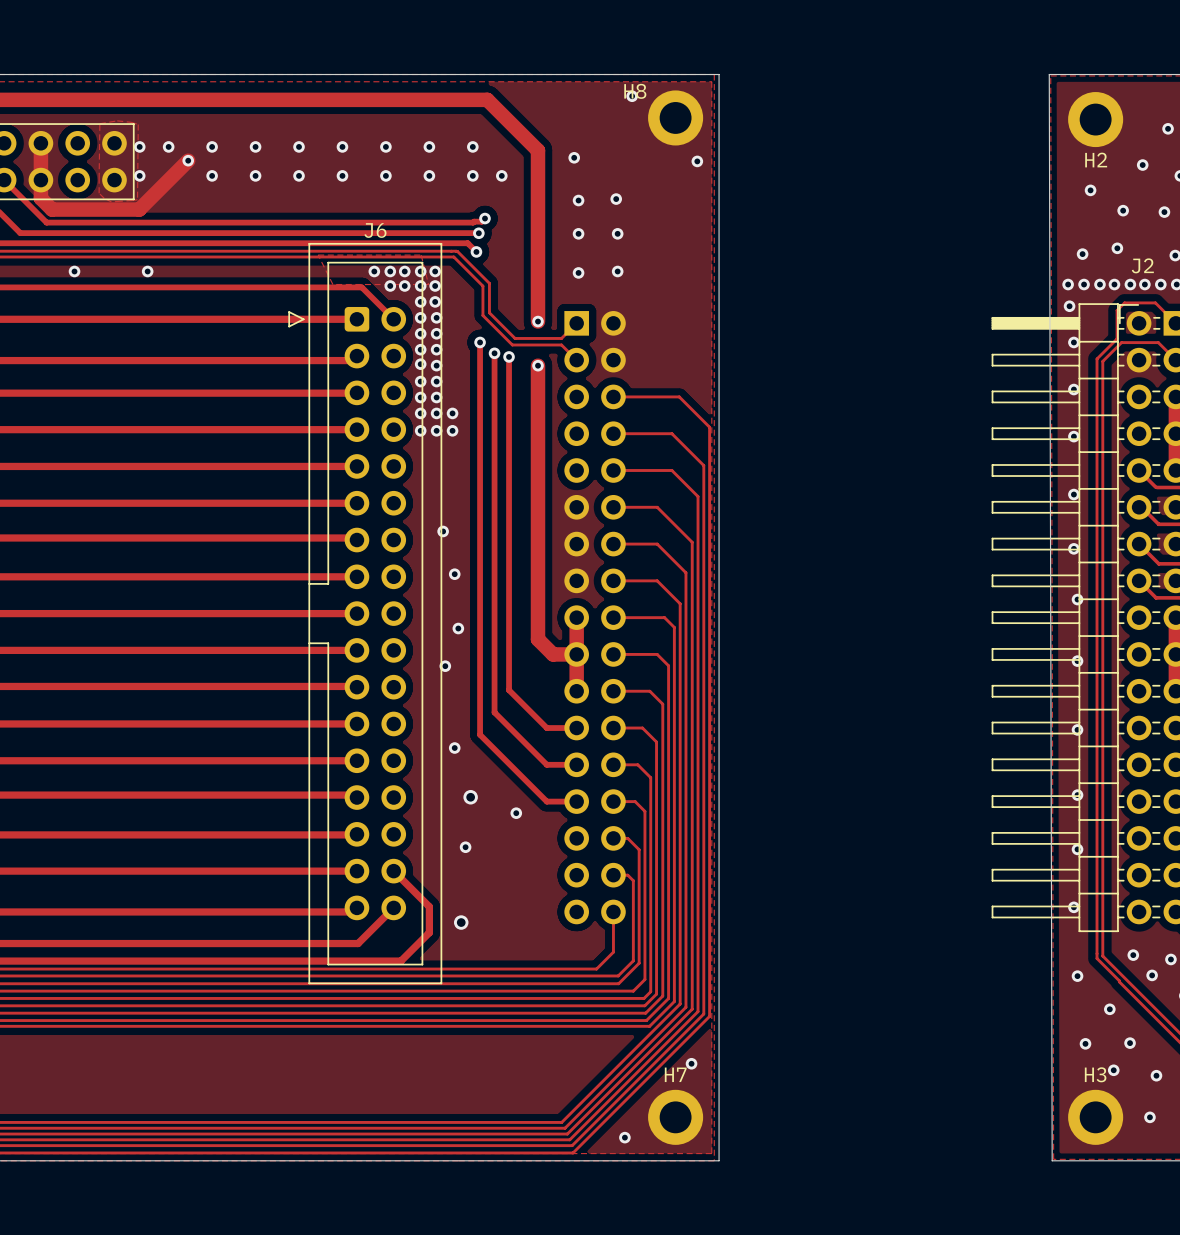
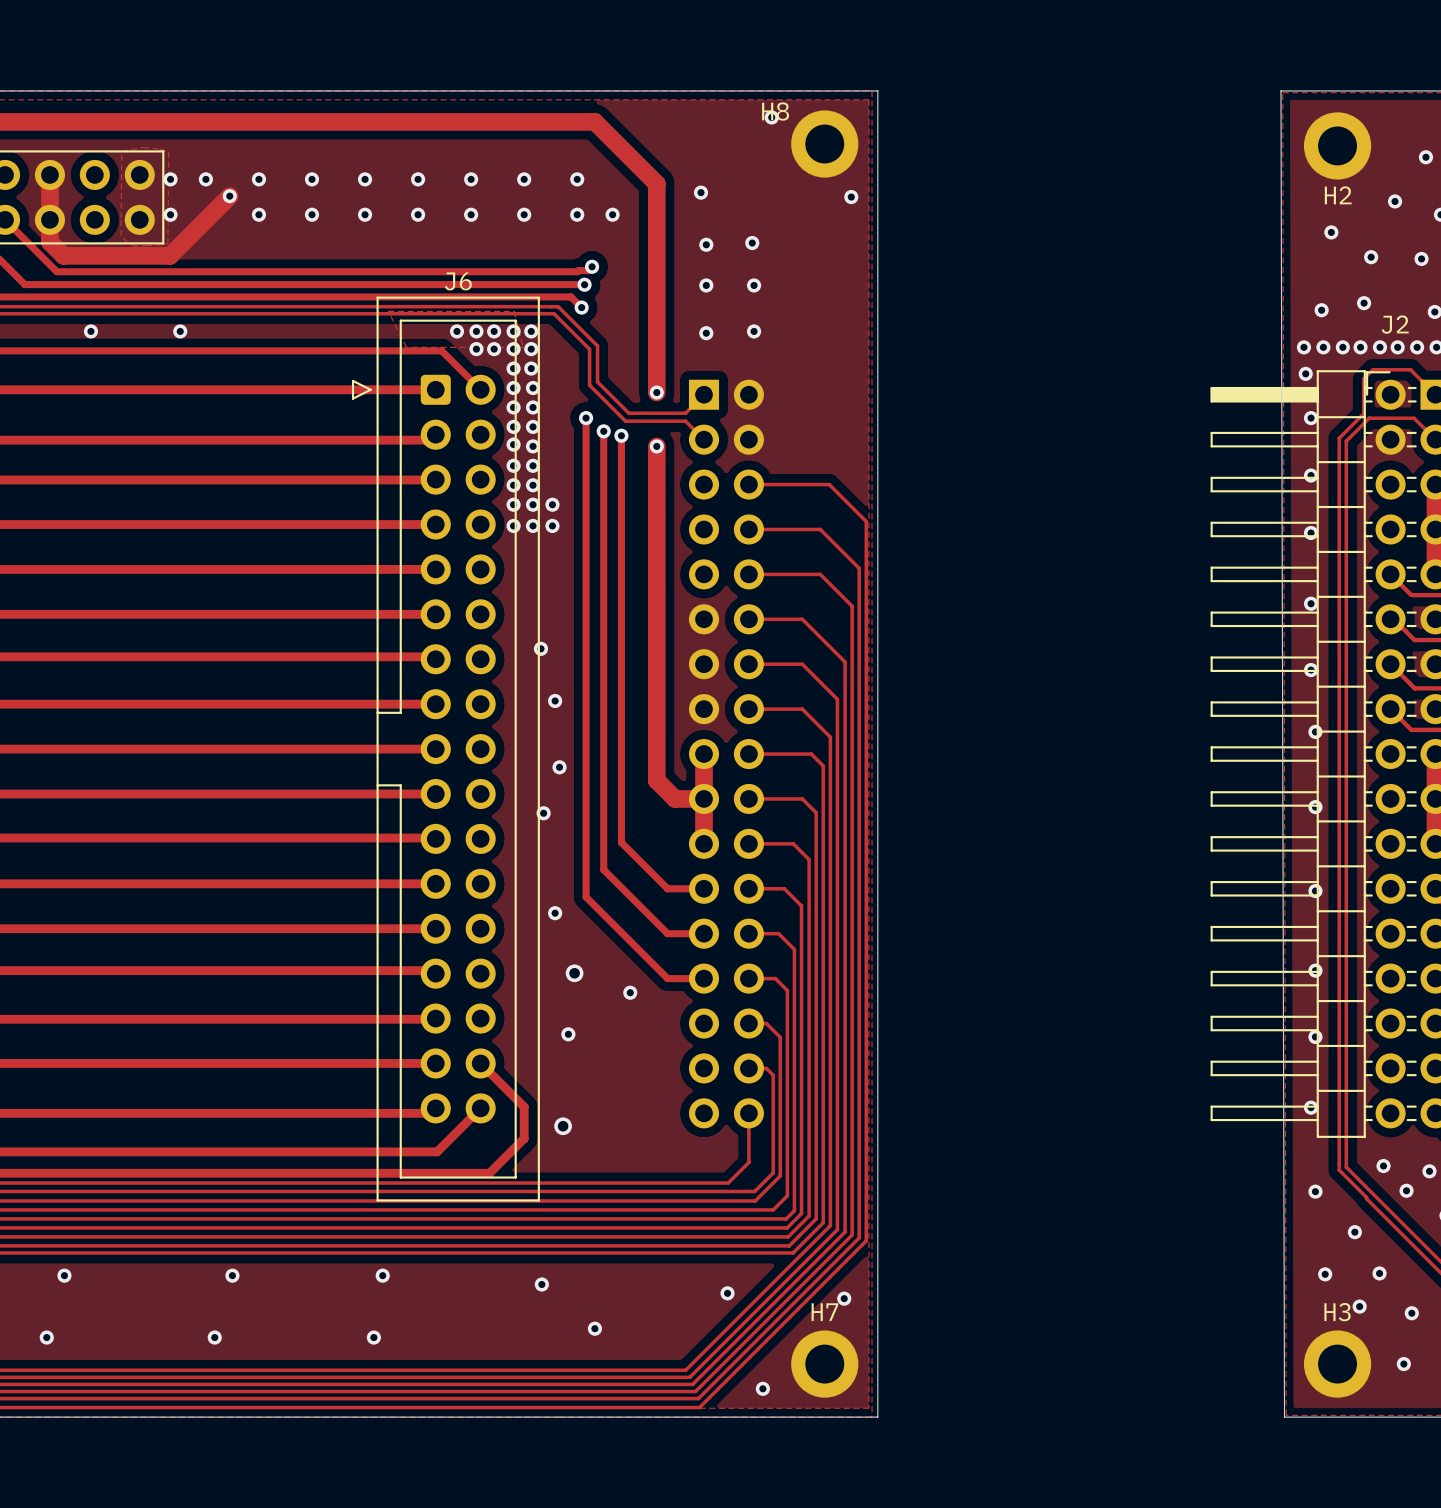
via: none -> (64, 1275)
via: none -> (232, 1275)
via: none -> (382, 1275)
via: none -> (541, 1284)
via: none -> (727, 1293)
via: none -> (594, 1328)
via: none -> (46, 1337)
via: none -> (214, 1337)
via: none -> (373, 1337)

